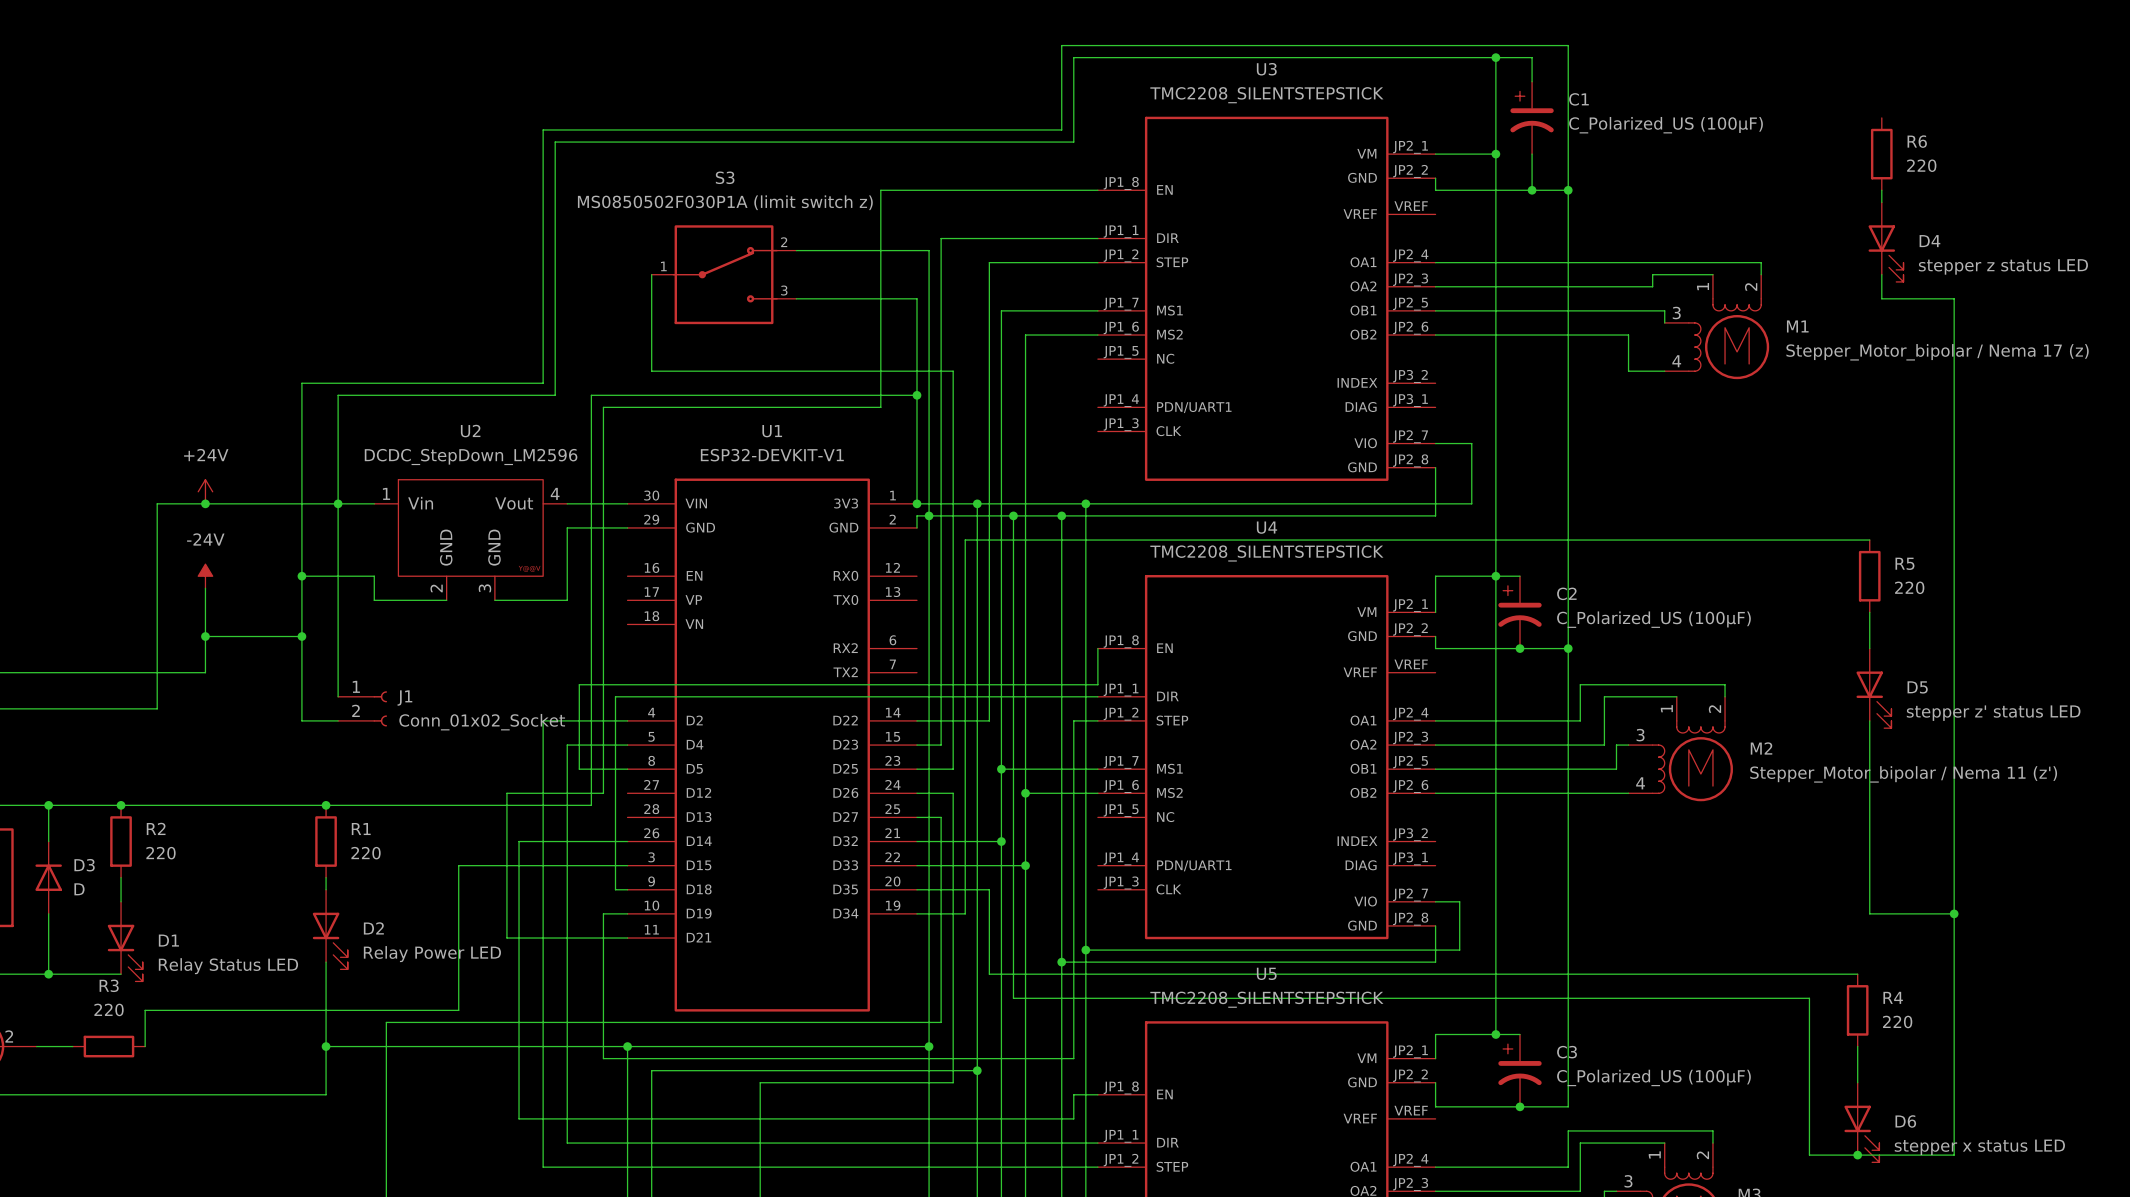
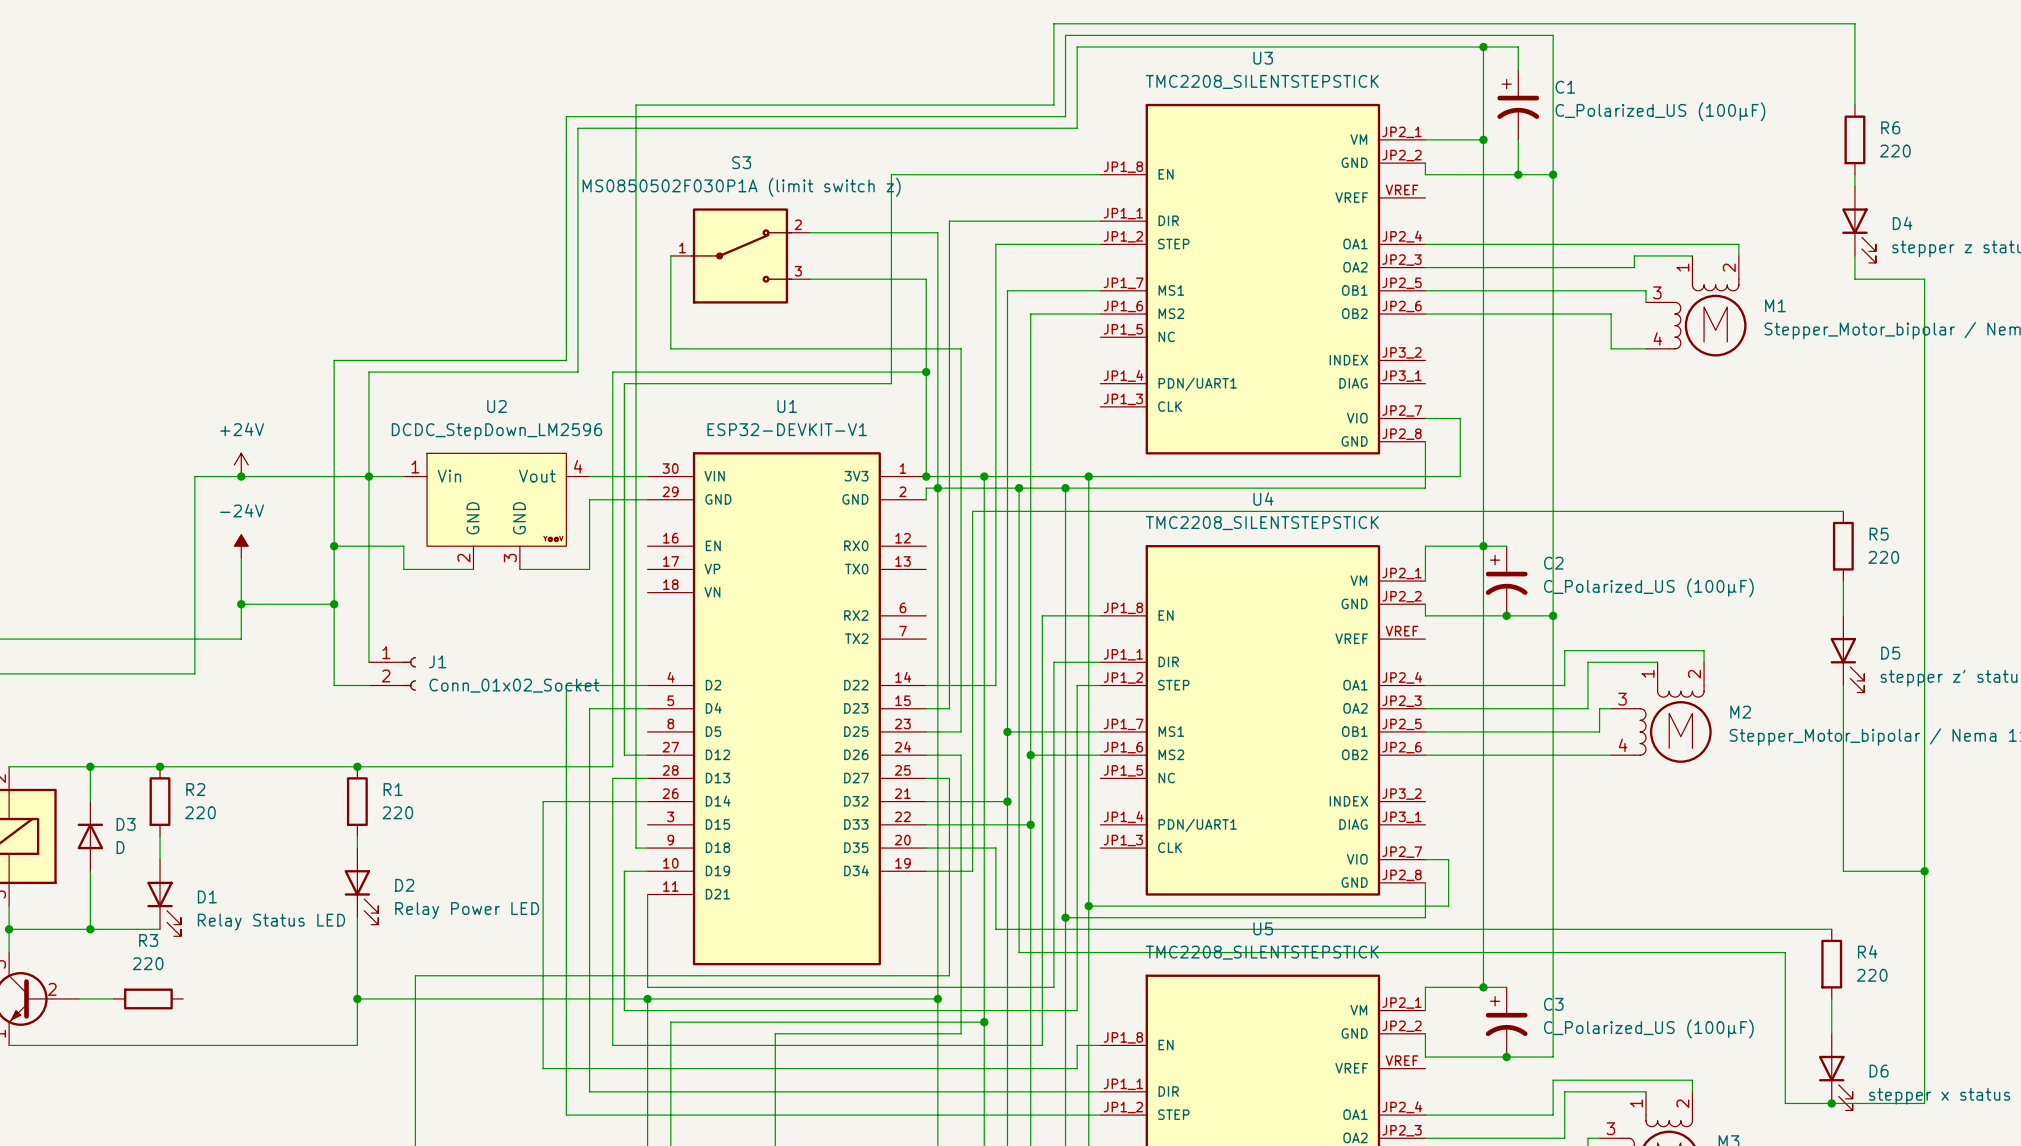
wire: none -> (1854, 105) (1854, 23) (1053, 23) (1053, 105) (635, 105) (635, 662)
wire: (1097, 648) (1097, 684) (579, 684) (579, 769) (627, 769) -> (1100, 615) (1042, 615) (1042, 1045) (612, 1045) (612, 778) (647, 778)
wire: (615, 696) (1049, 696) -> (647, 894) (647, 987) (1053, 987) (1053, 662)
wire: (603, 793) (506, 793) (506, 938) (627, 938) -> (624, 755) (647, 755)
wire: (627, 865) (458, 865) (458, 1010) (145, 1010) (145, 1046) -> none

